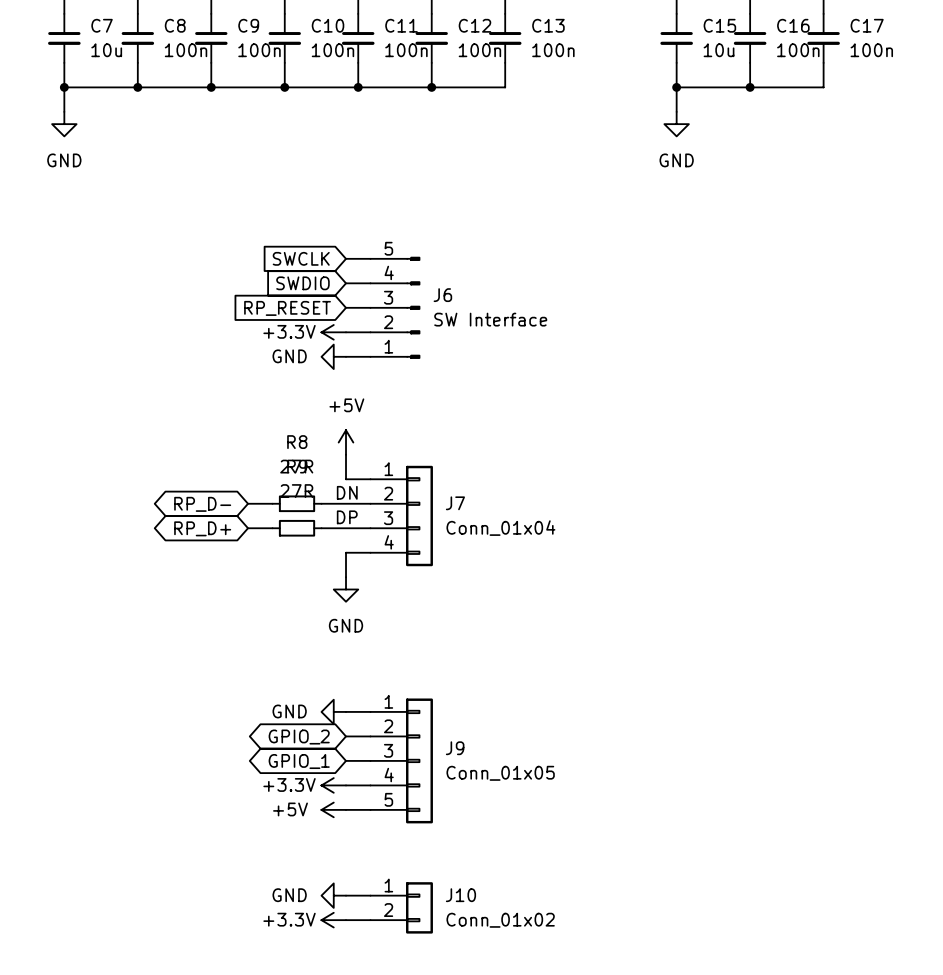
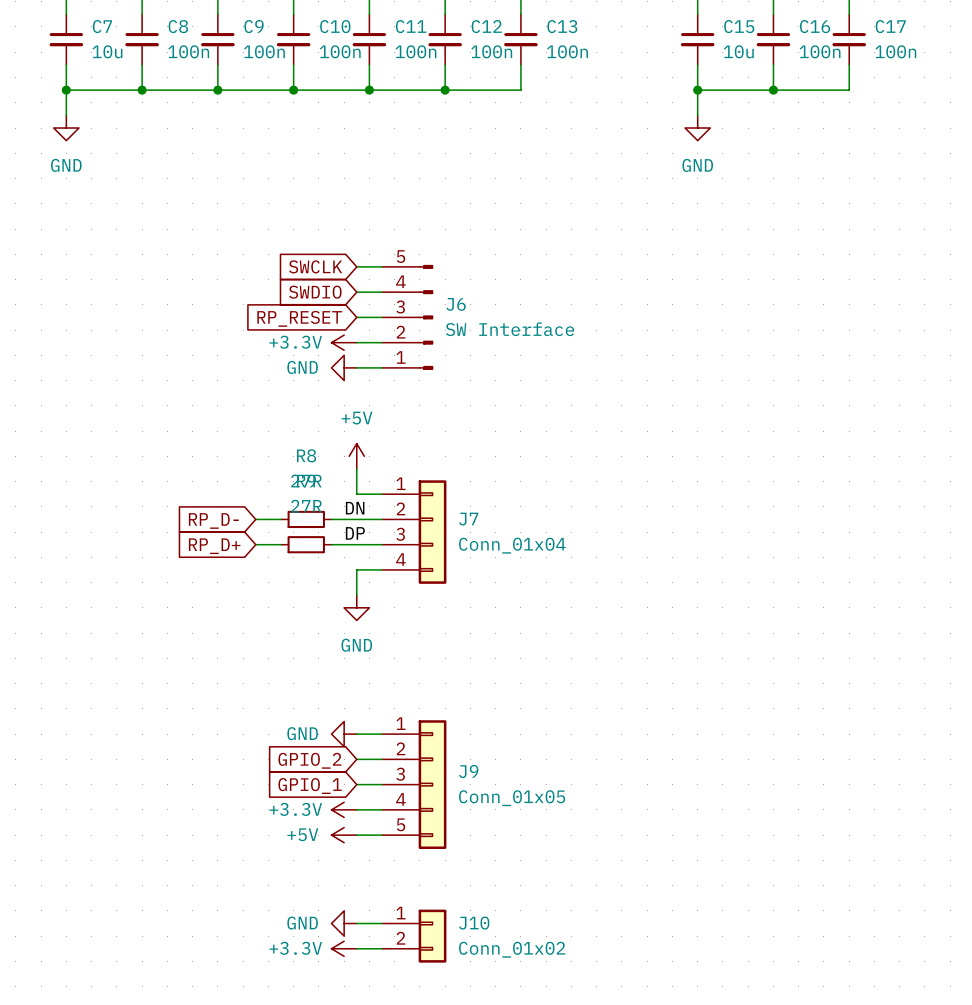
global label shape: bidirectional (202, 504) -> input (213, 520)
global label shape: bidirectional (202, 528) -> input (214, 546)
global label shape: bidirectional (299, 737) -> input (309, 760)
global label shape: bidirectional (299, 761) -> input (310, 786)

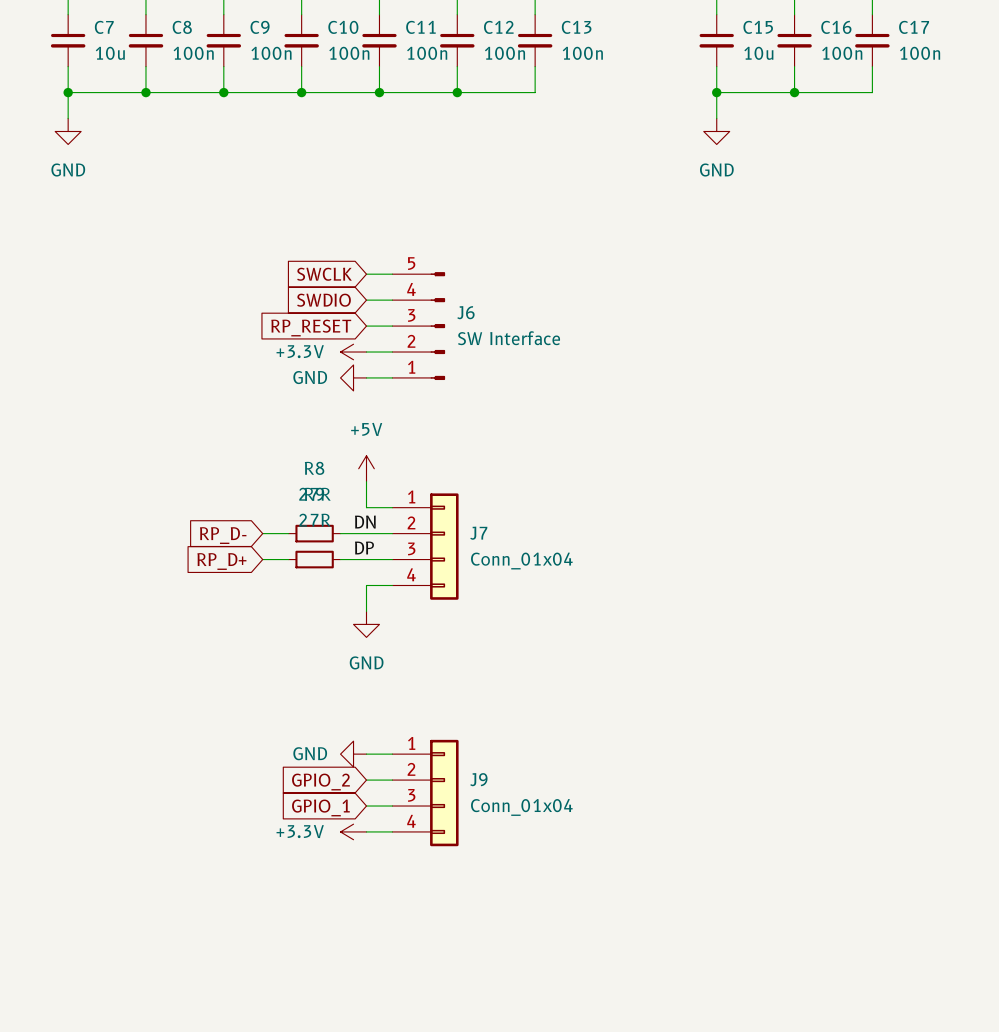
J9 symbol: [382, 720, 447, 850] -> [392, 739, 459, 847]
J9 value: Conn_01x05 (512, 798) -> Conn_01x04 (521, 807)
power symbol: +5V (344, 835) -> none
wire: (356, 835) (382, 835) -> none
power symbol: GND (344, 923) -> none
wire: (356, 923) (382, 923) -> none
J10: Conn_01x02 (414, 936) -> none
power symbol: +3.3V (344, 948) -> none
wire: (356, 948) (382, 948) -> none

